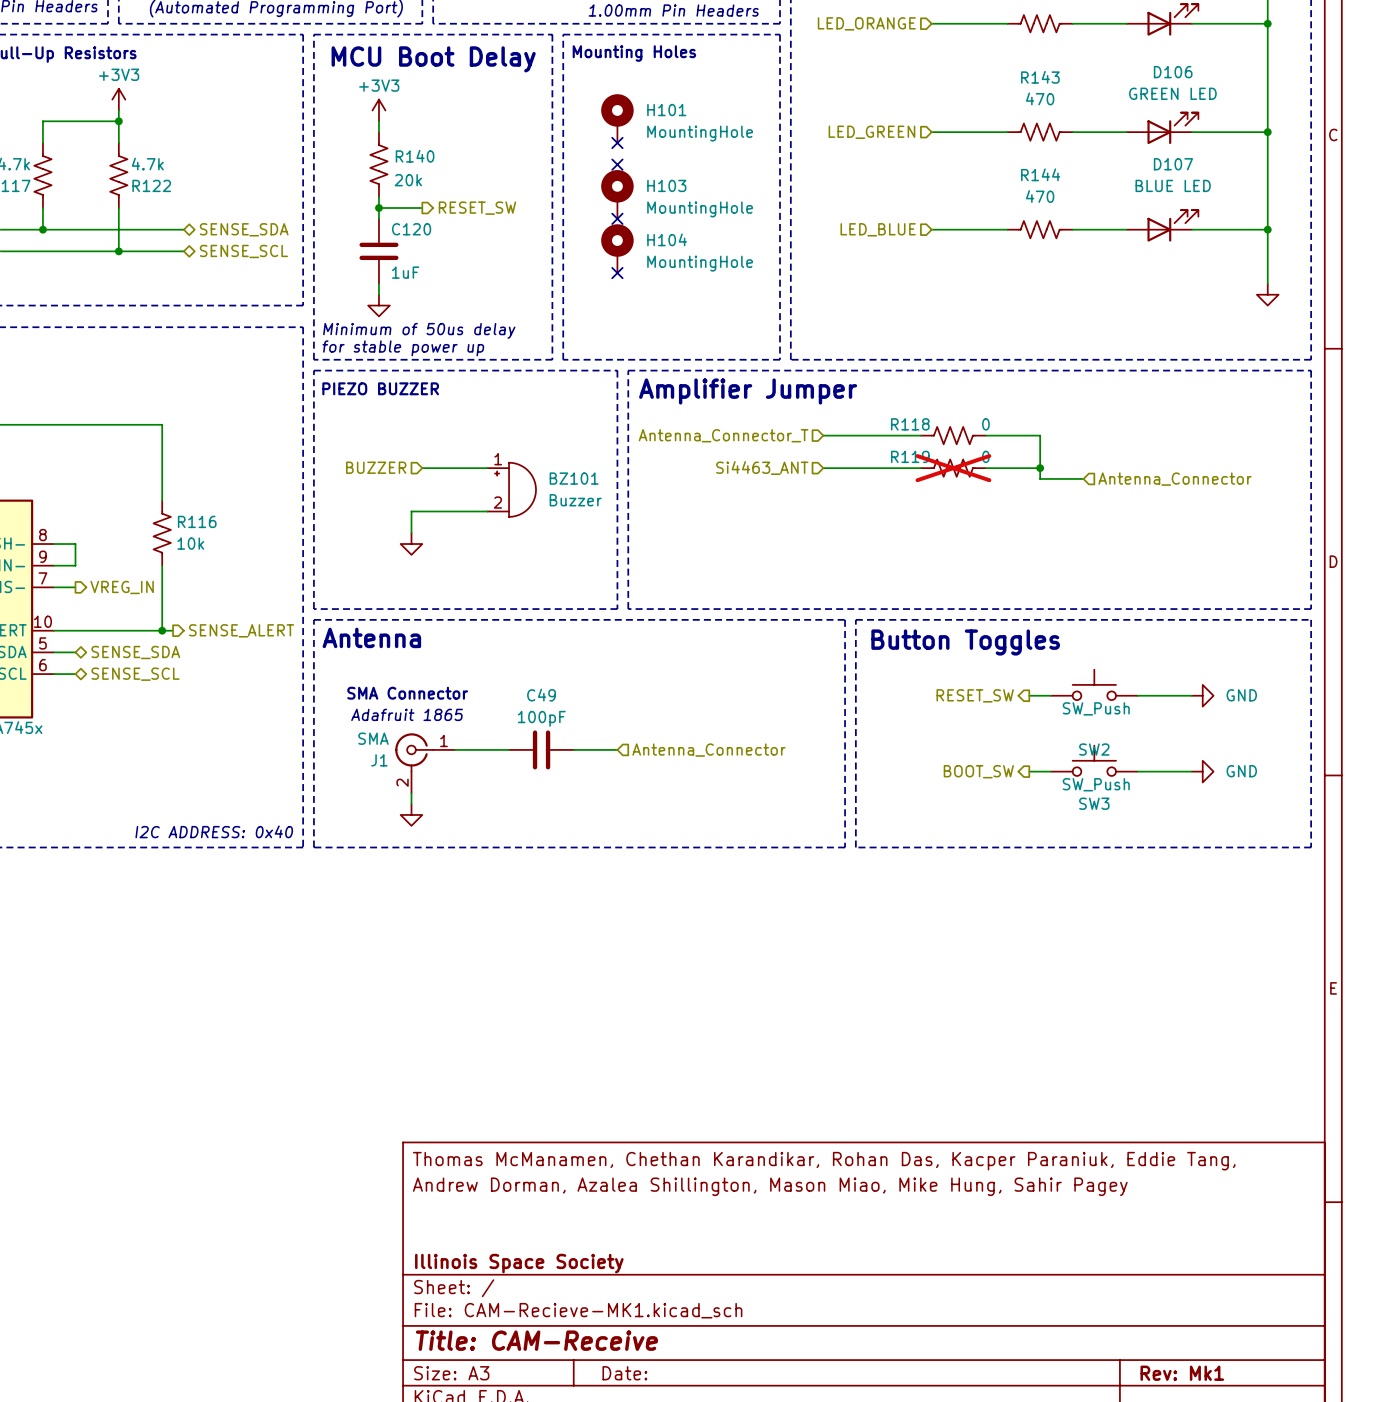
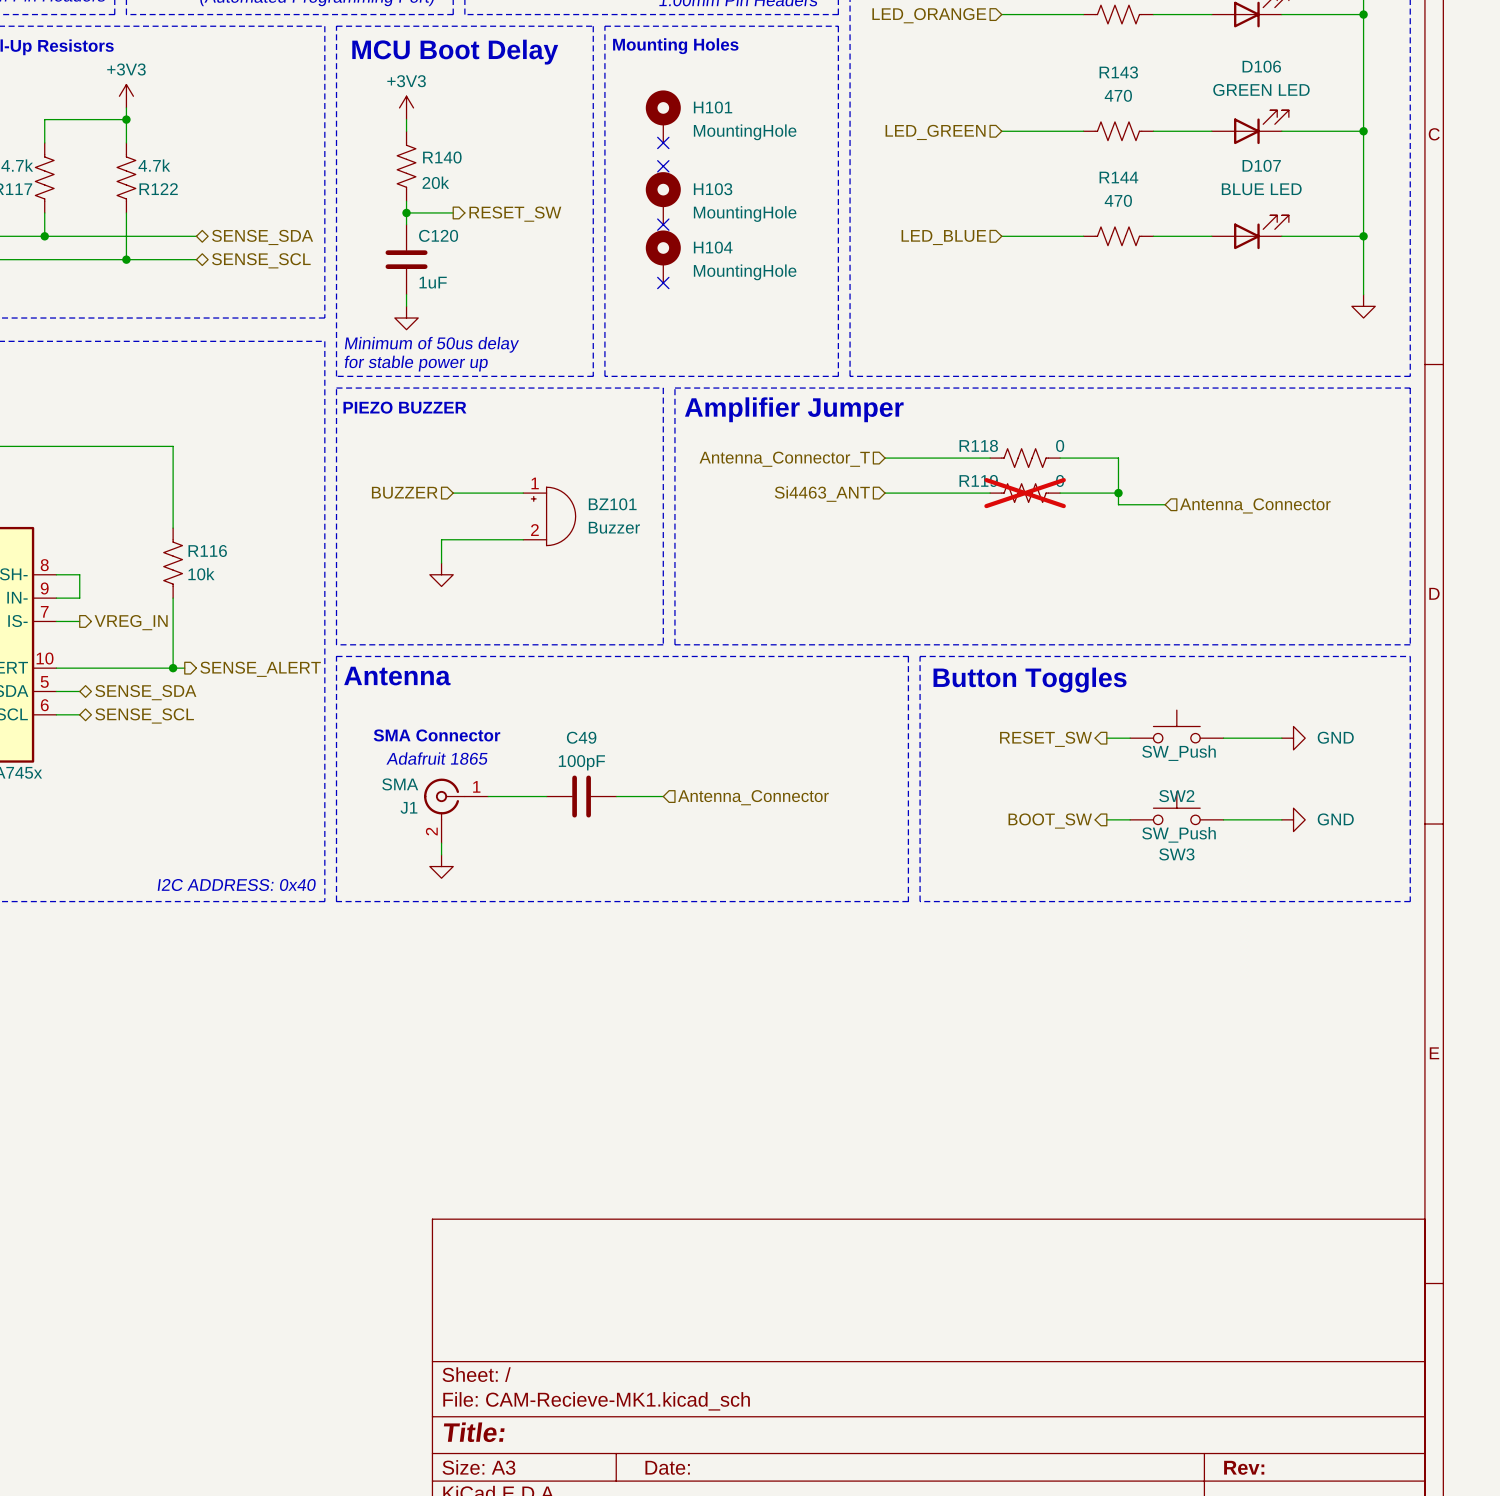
title block: Thomas McManamen, Chethan Karandikar, Rohan Das, Kacper Paraniuk, Eddie Tang, (824, 1161) -> none
title block: Andrew Dorman, Azalea Shillington, Mason Miao, Mike Hung, Sahir Pagey (770, 1186) -> none
title block: Illinois Space Society (519, 1263) -> none
title block: Title: CAM-Receive (536, 1340) -> Title: (474, 1432)
title block: Rev: Mk1 (1182, 1373) -> Rev: (1244, 1467)

